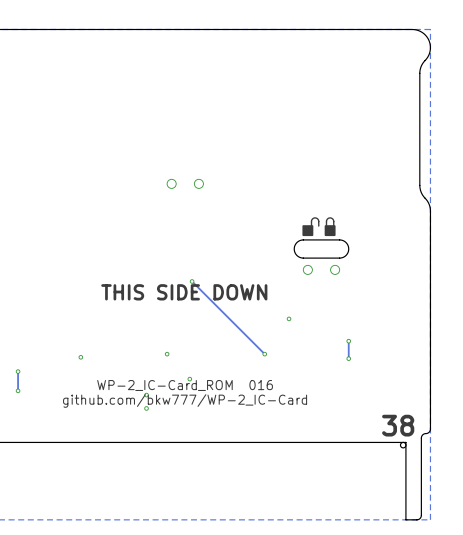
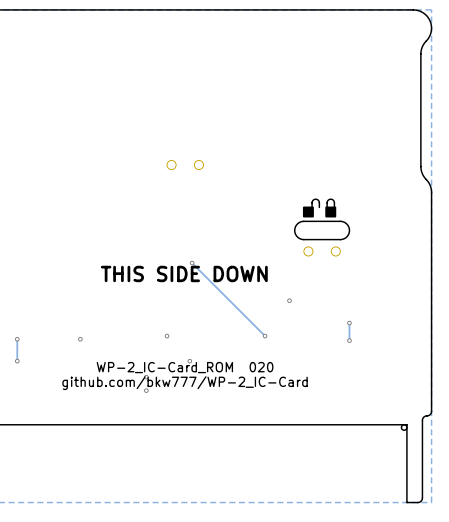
track: none -> (17, 339) (17, 353)
via: none -> (17, 339)
via: (18, 371) -> none
track: (18, 379) (18, 390) -> none
via: none -> (17, 361)
text: WP-2_IC-Card_ROM 016 (185, 385) -> WP-2_IC-Card_ROM 020 (185, 367)
via: (18, 390) -> none
text: 38 (398, 425) -> none

